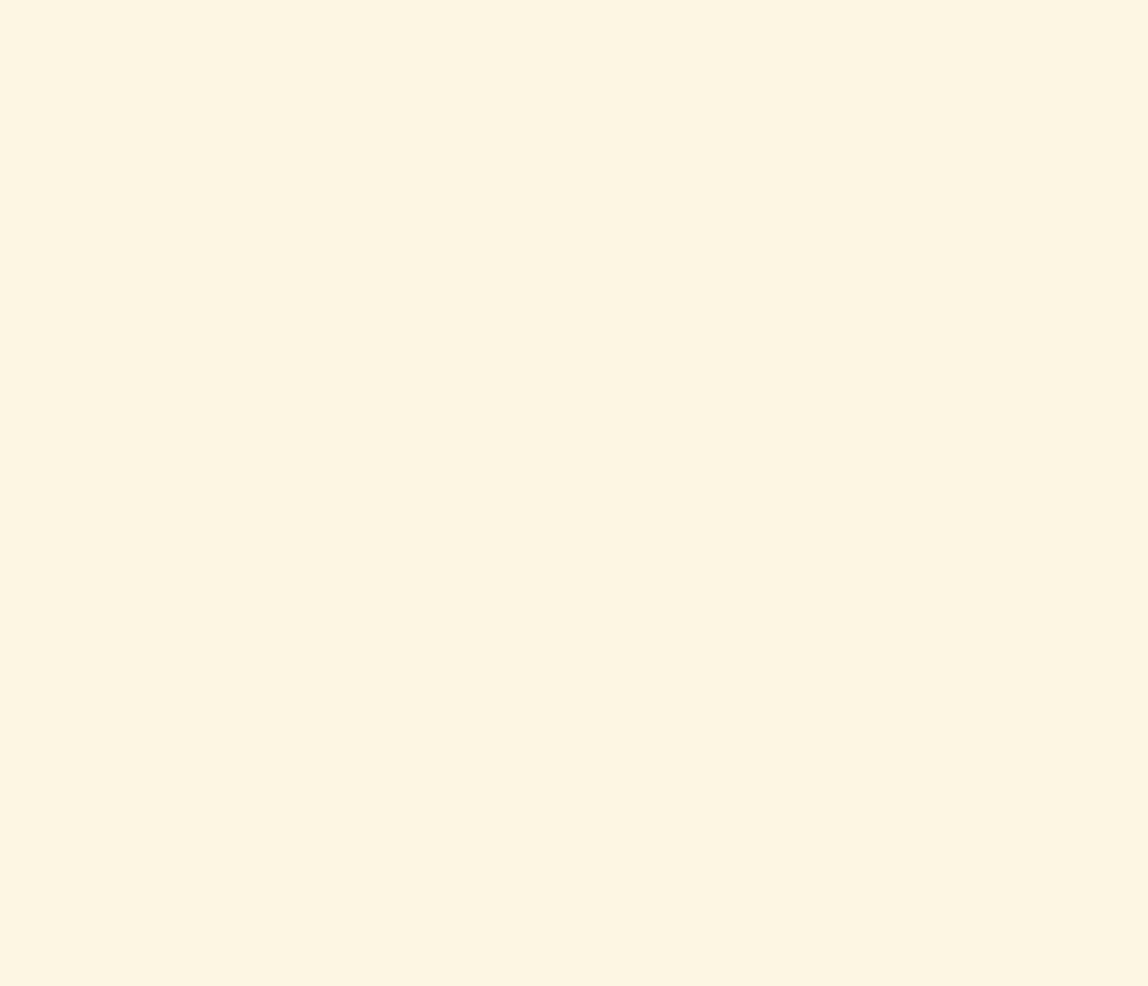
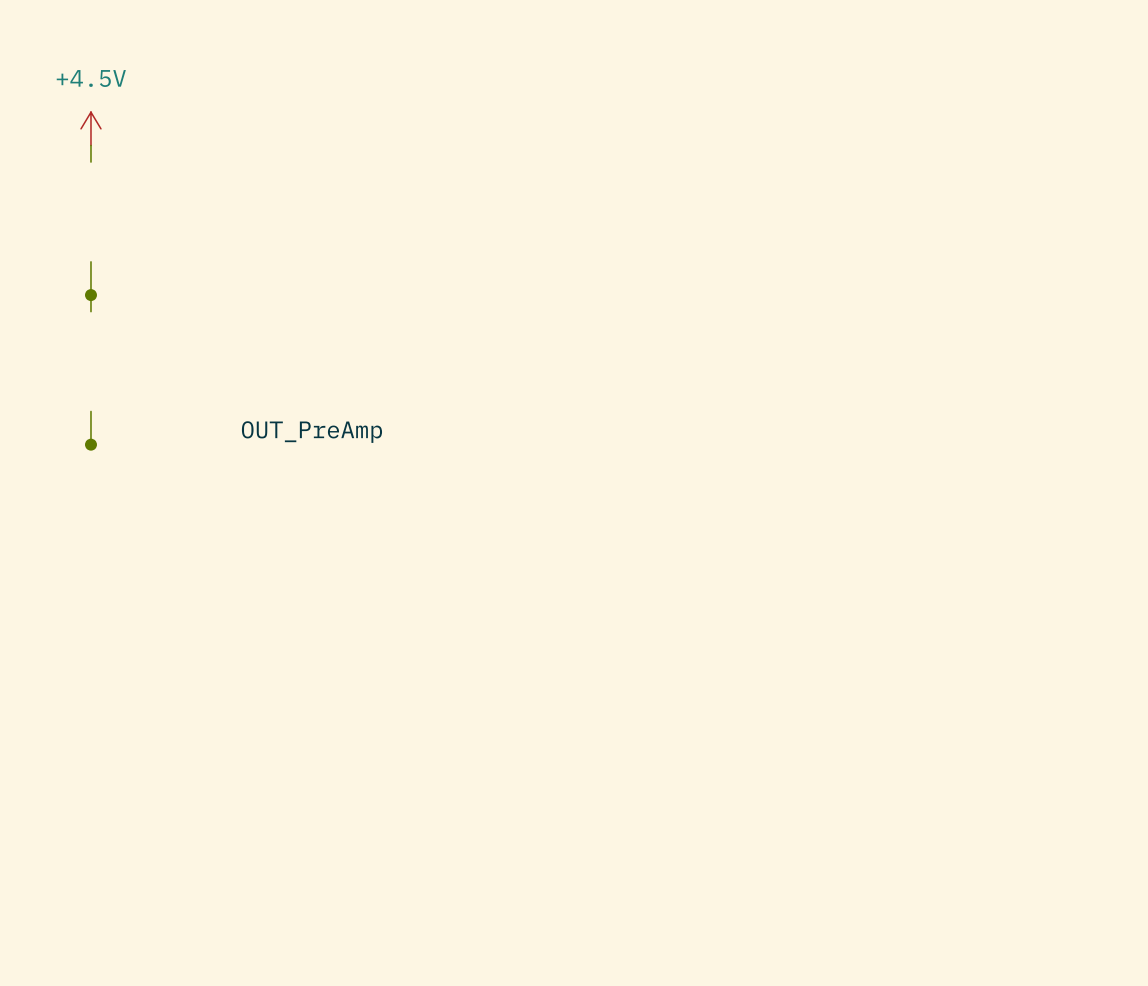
power symbol: none -> +4.5V (90, 128)
wire: none -> (90, 145) (90, 162)
wire: none -> (90, 261) (90, 311)
junction: none -> (90, 295)
wire: none -> (90, 411) (90, 444)
label: none -> OUT_PreAmp (311, 432)
junction: none -> (90, 444)

